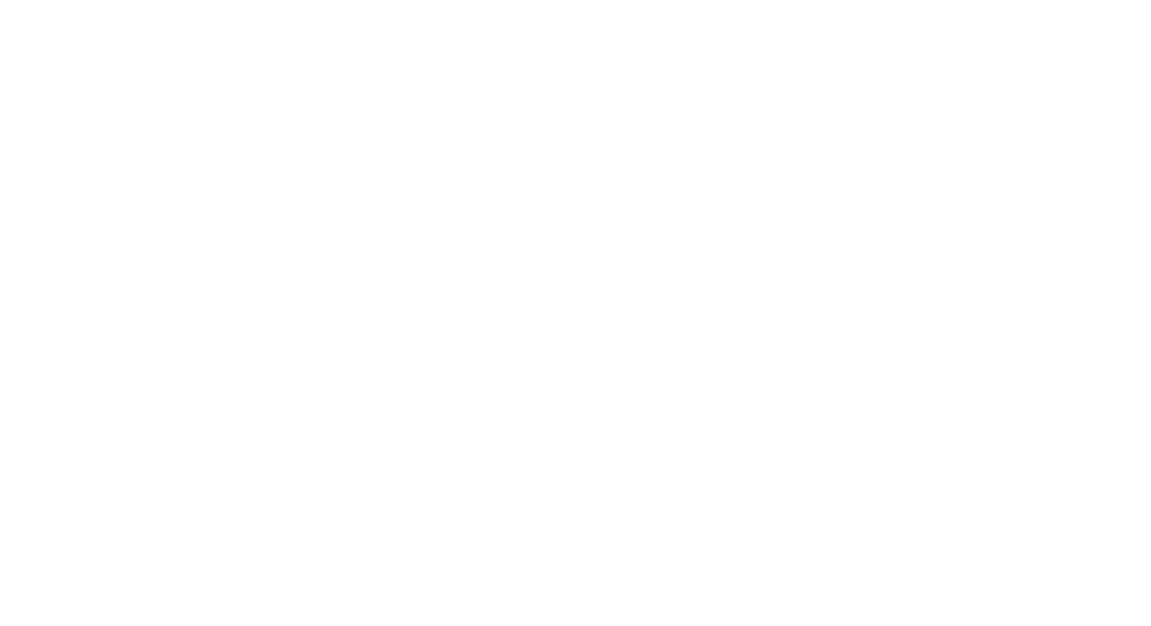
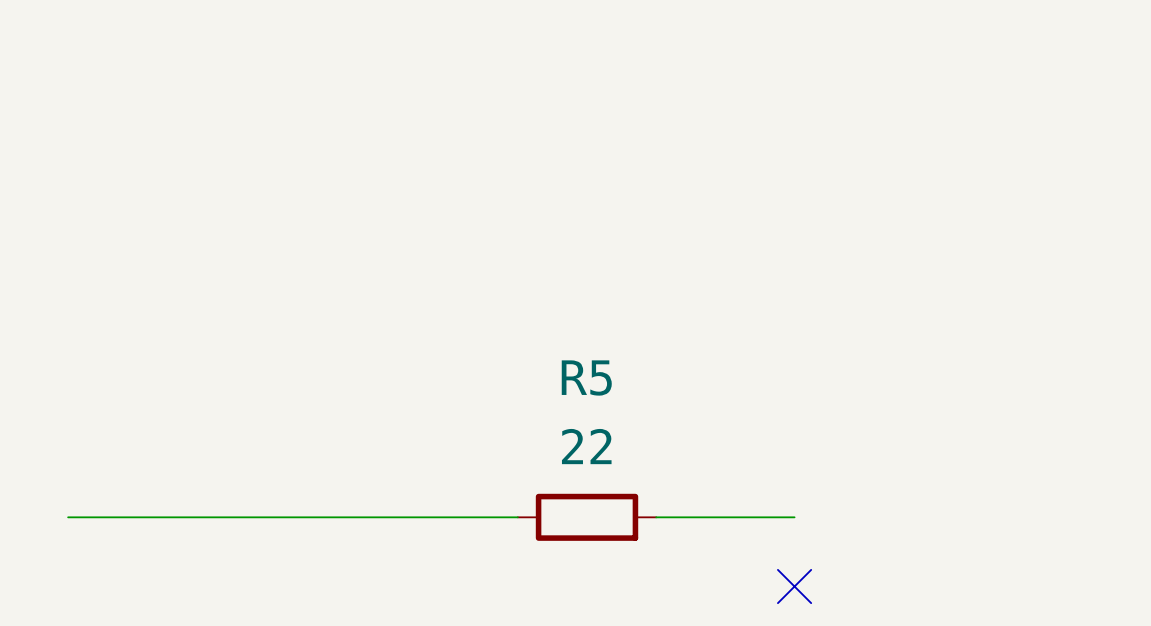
wire: none -> (68, 517) (517, 517)
R5: none -> 22 (587, 517)
wire: none -> (656, 517) (794, 517)
no-connect mark: none -> (794, 586)

